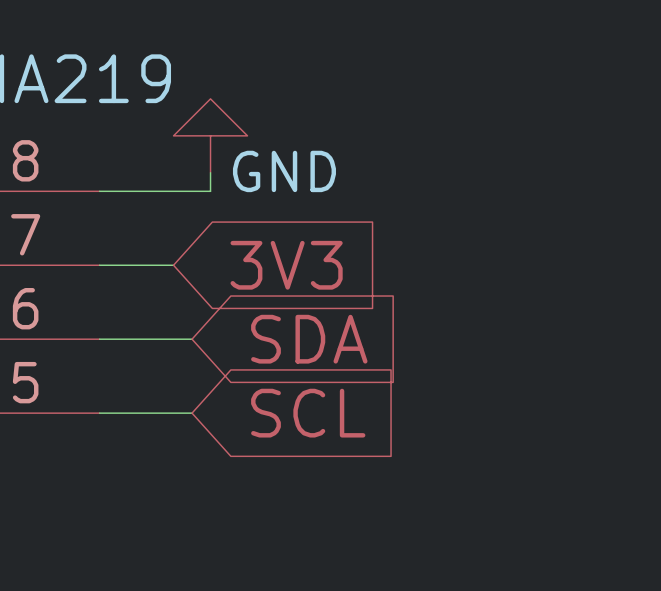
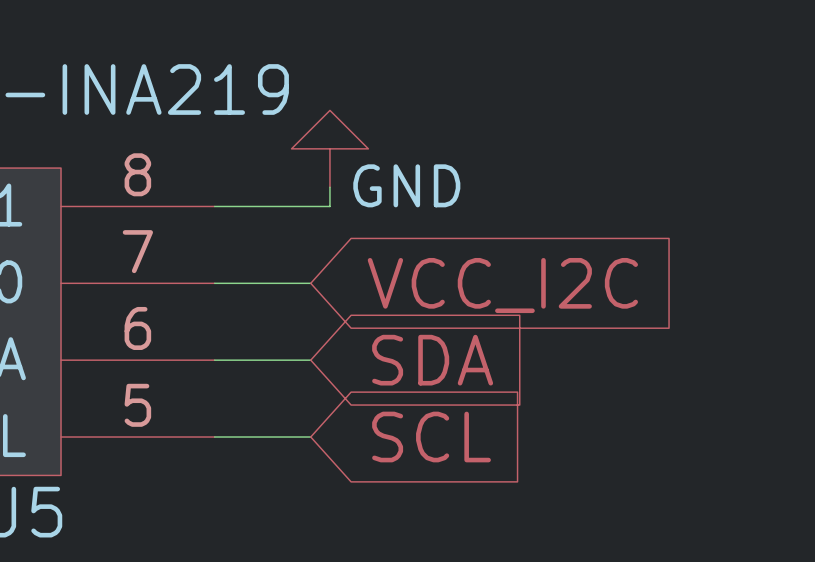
wire: none -> (291, 283) (310, 283)
global label: 3V3 (286, 265) -> VCC_I2C (502, 285)

